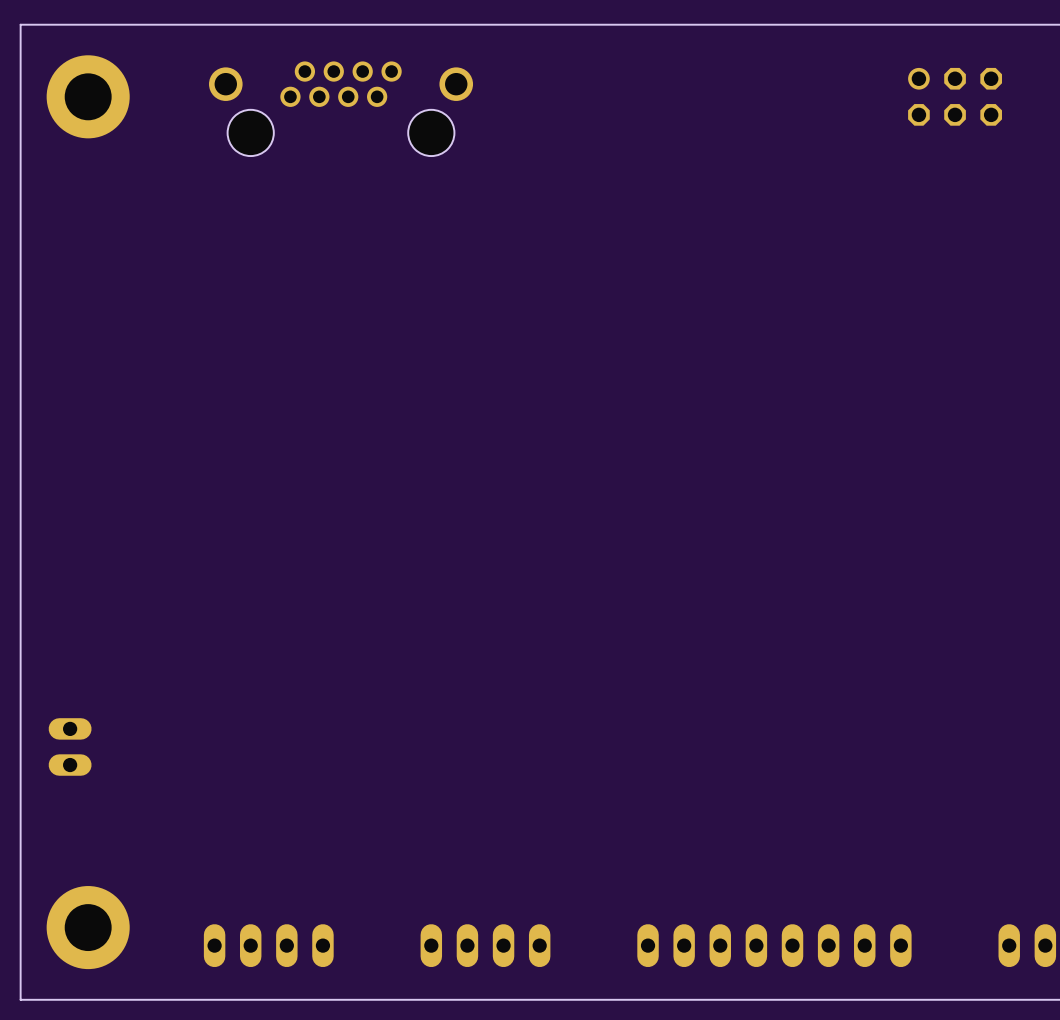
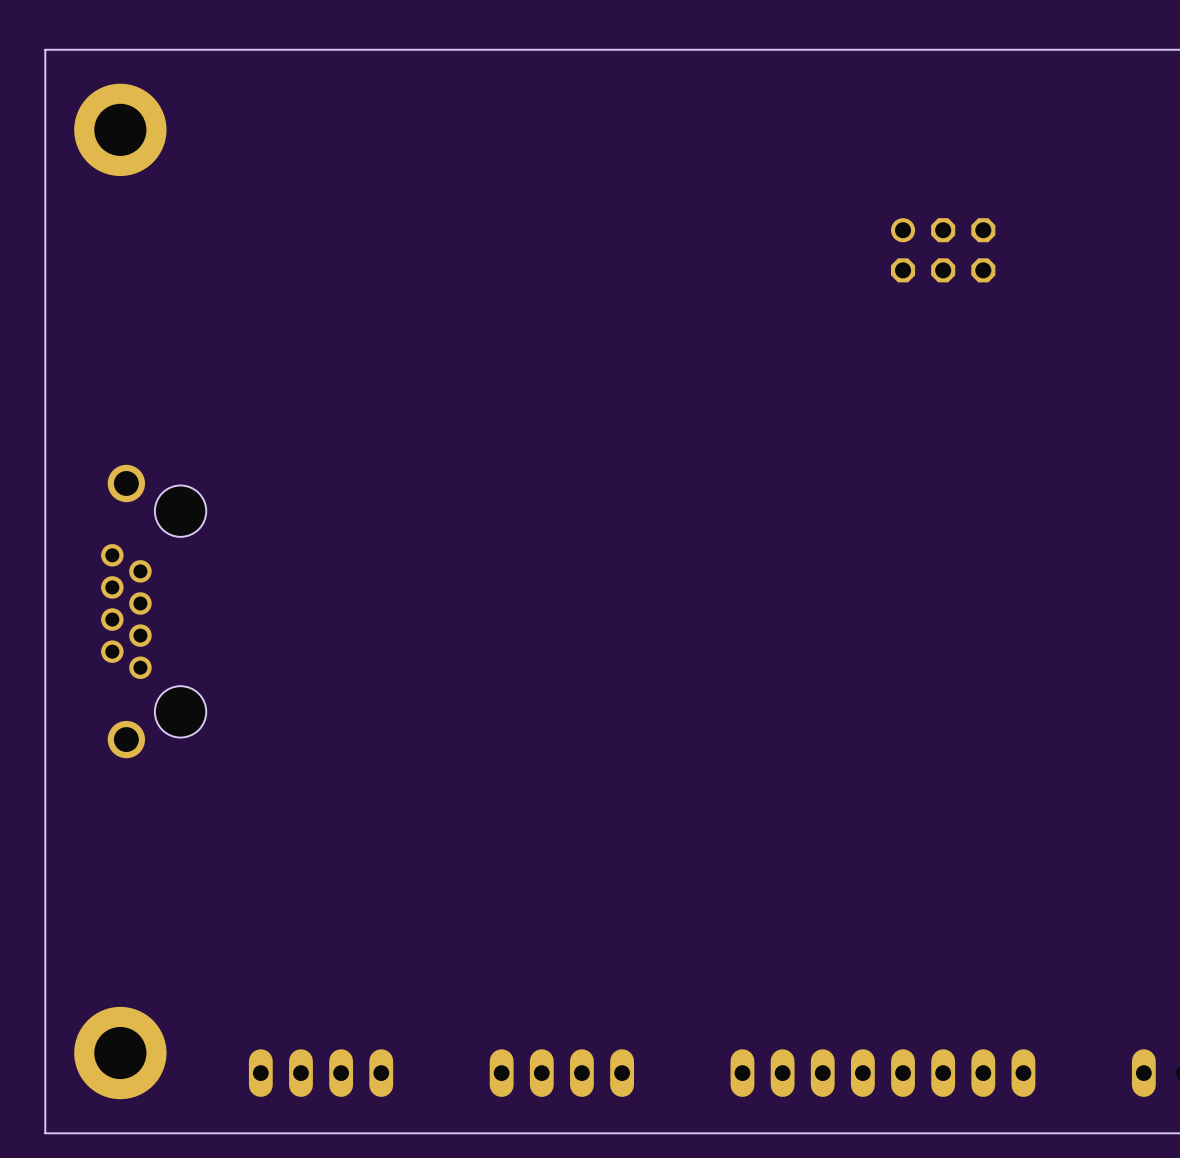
part position: (955, 96) -> (943, 250)
part: (341, 108) -> none
part: none -> (153, 611)
part: (70, 746) -> none

